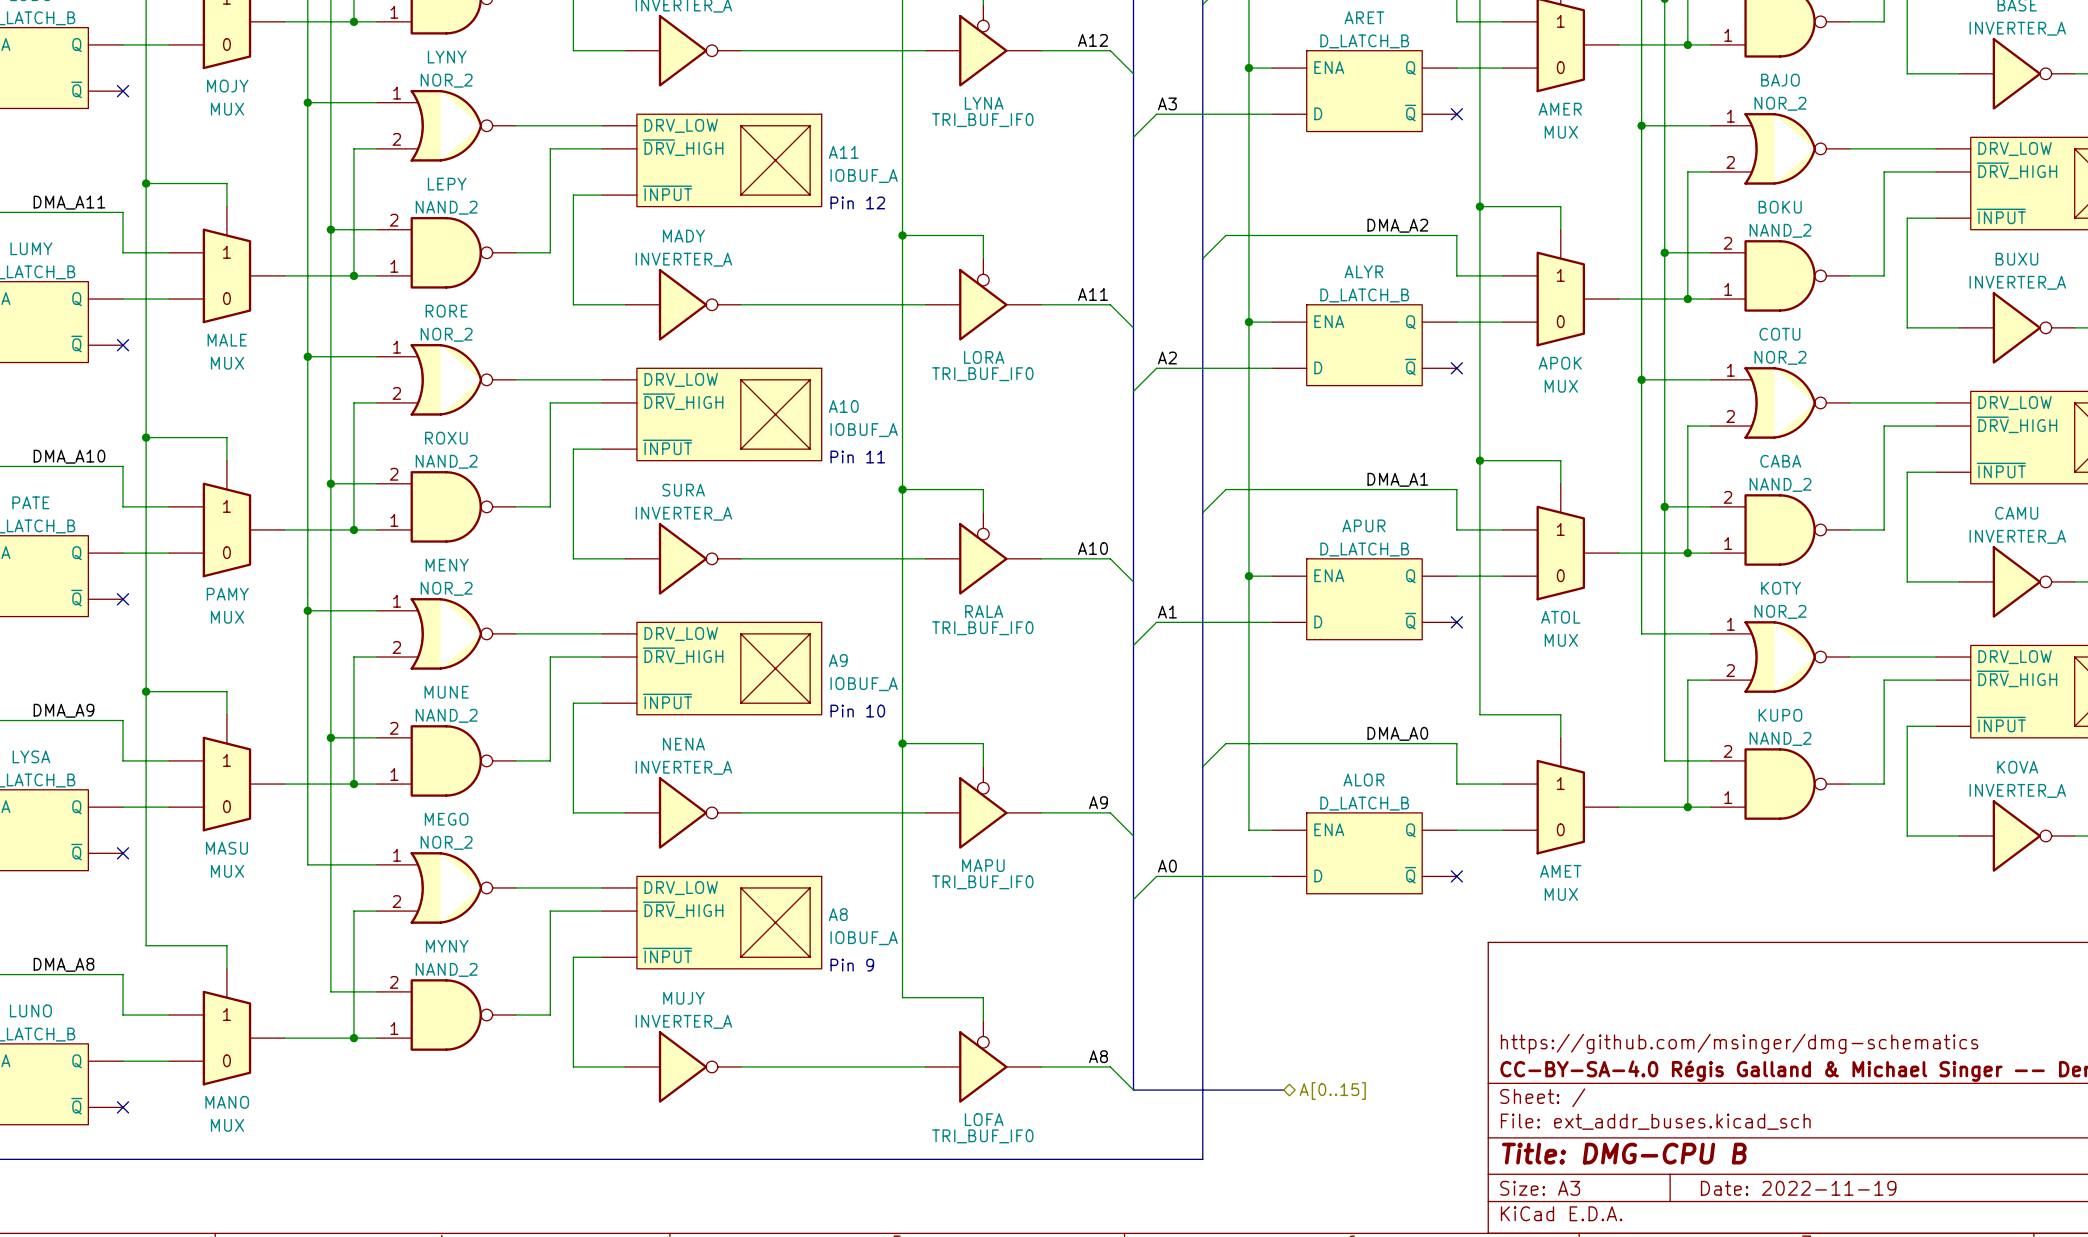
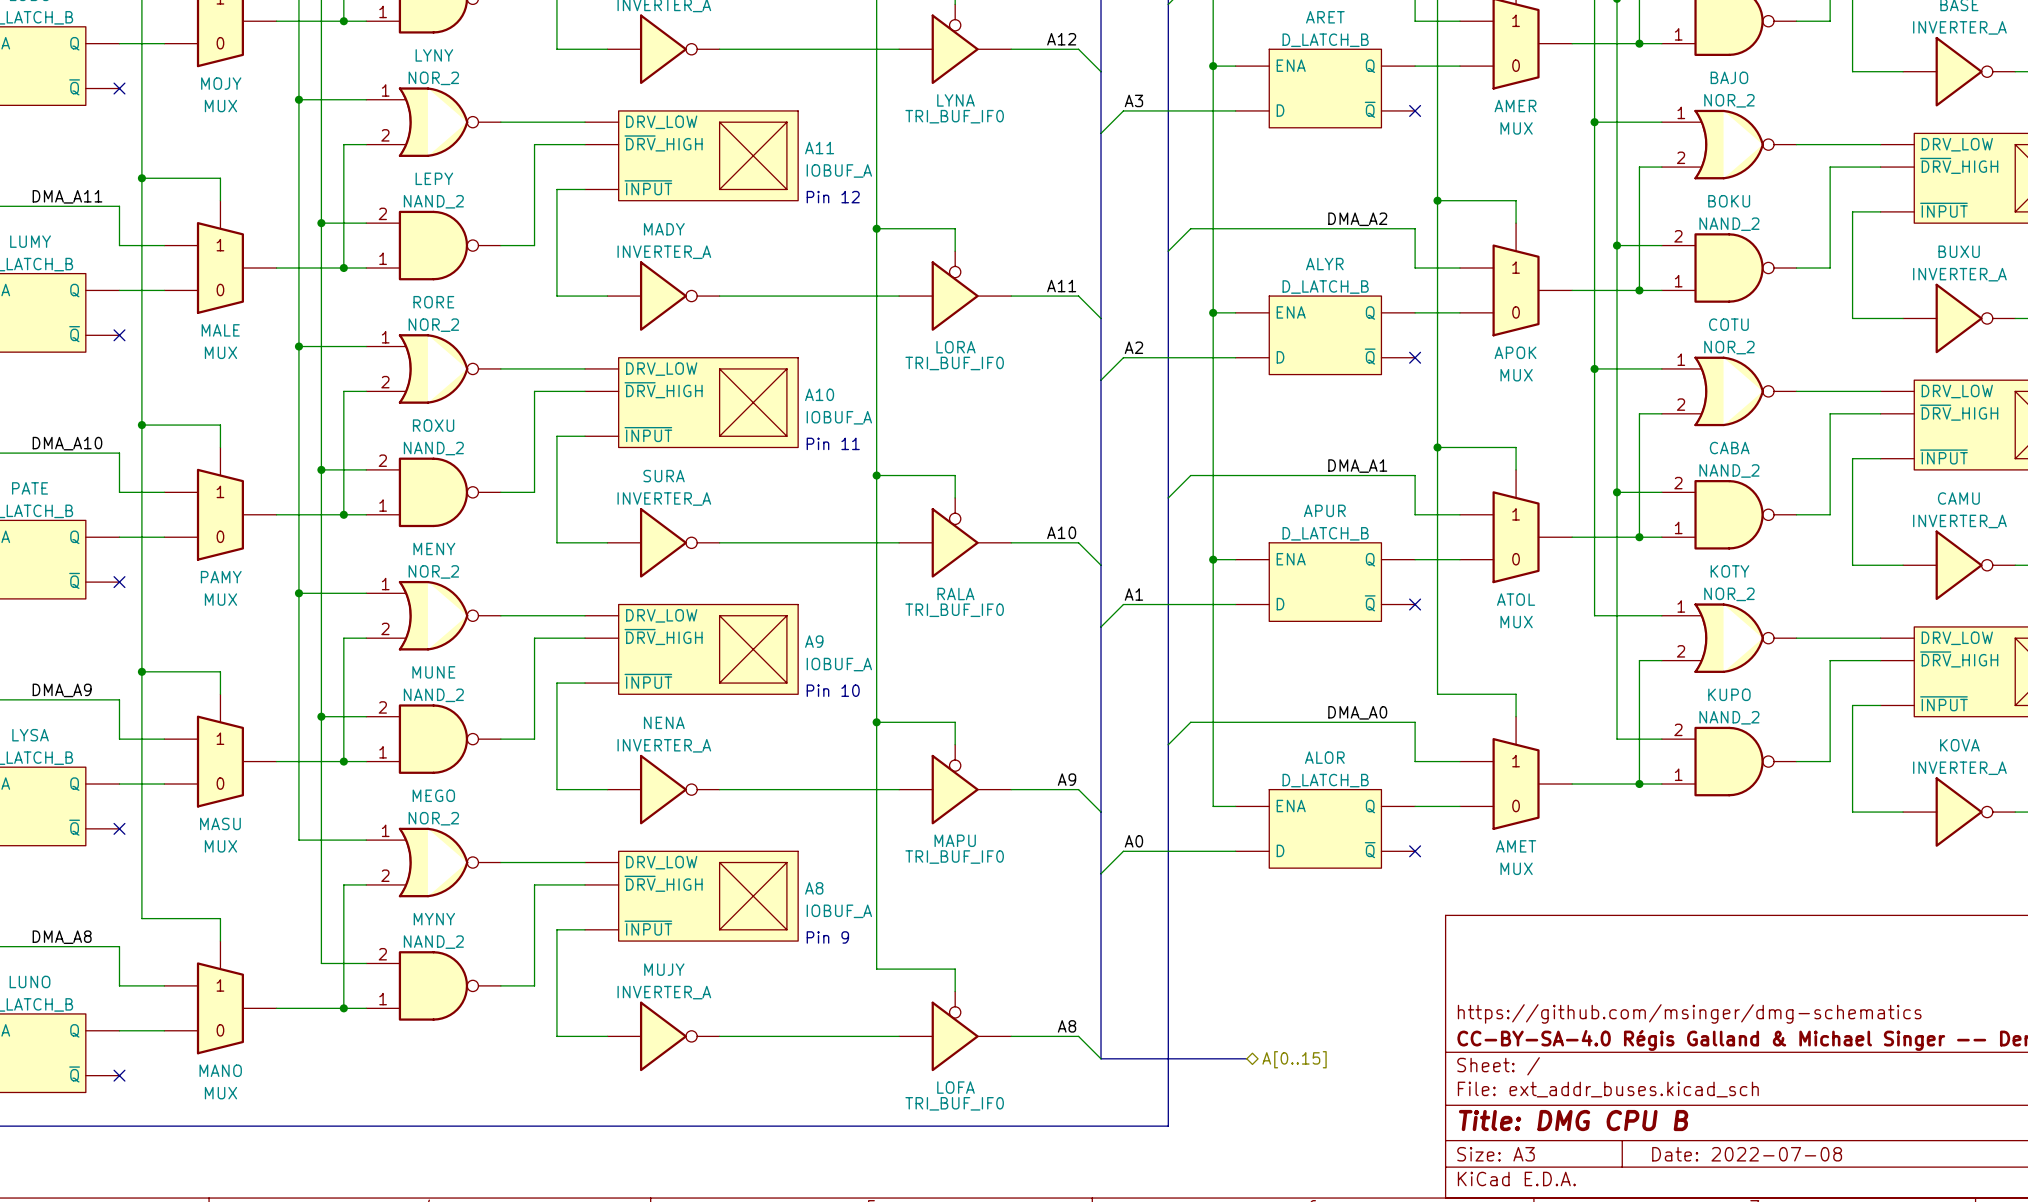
title block: Title: DMG-CPU B (1624, 1153) -> Title: DMG CPU B (1573, 1120)
title block: Date: 2022-11-19 (1798, 1188) -> Date: 2022-07-08 (1747, 1154)

